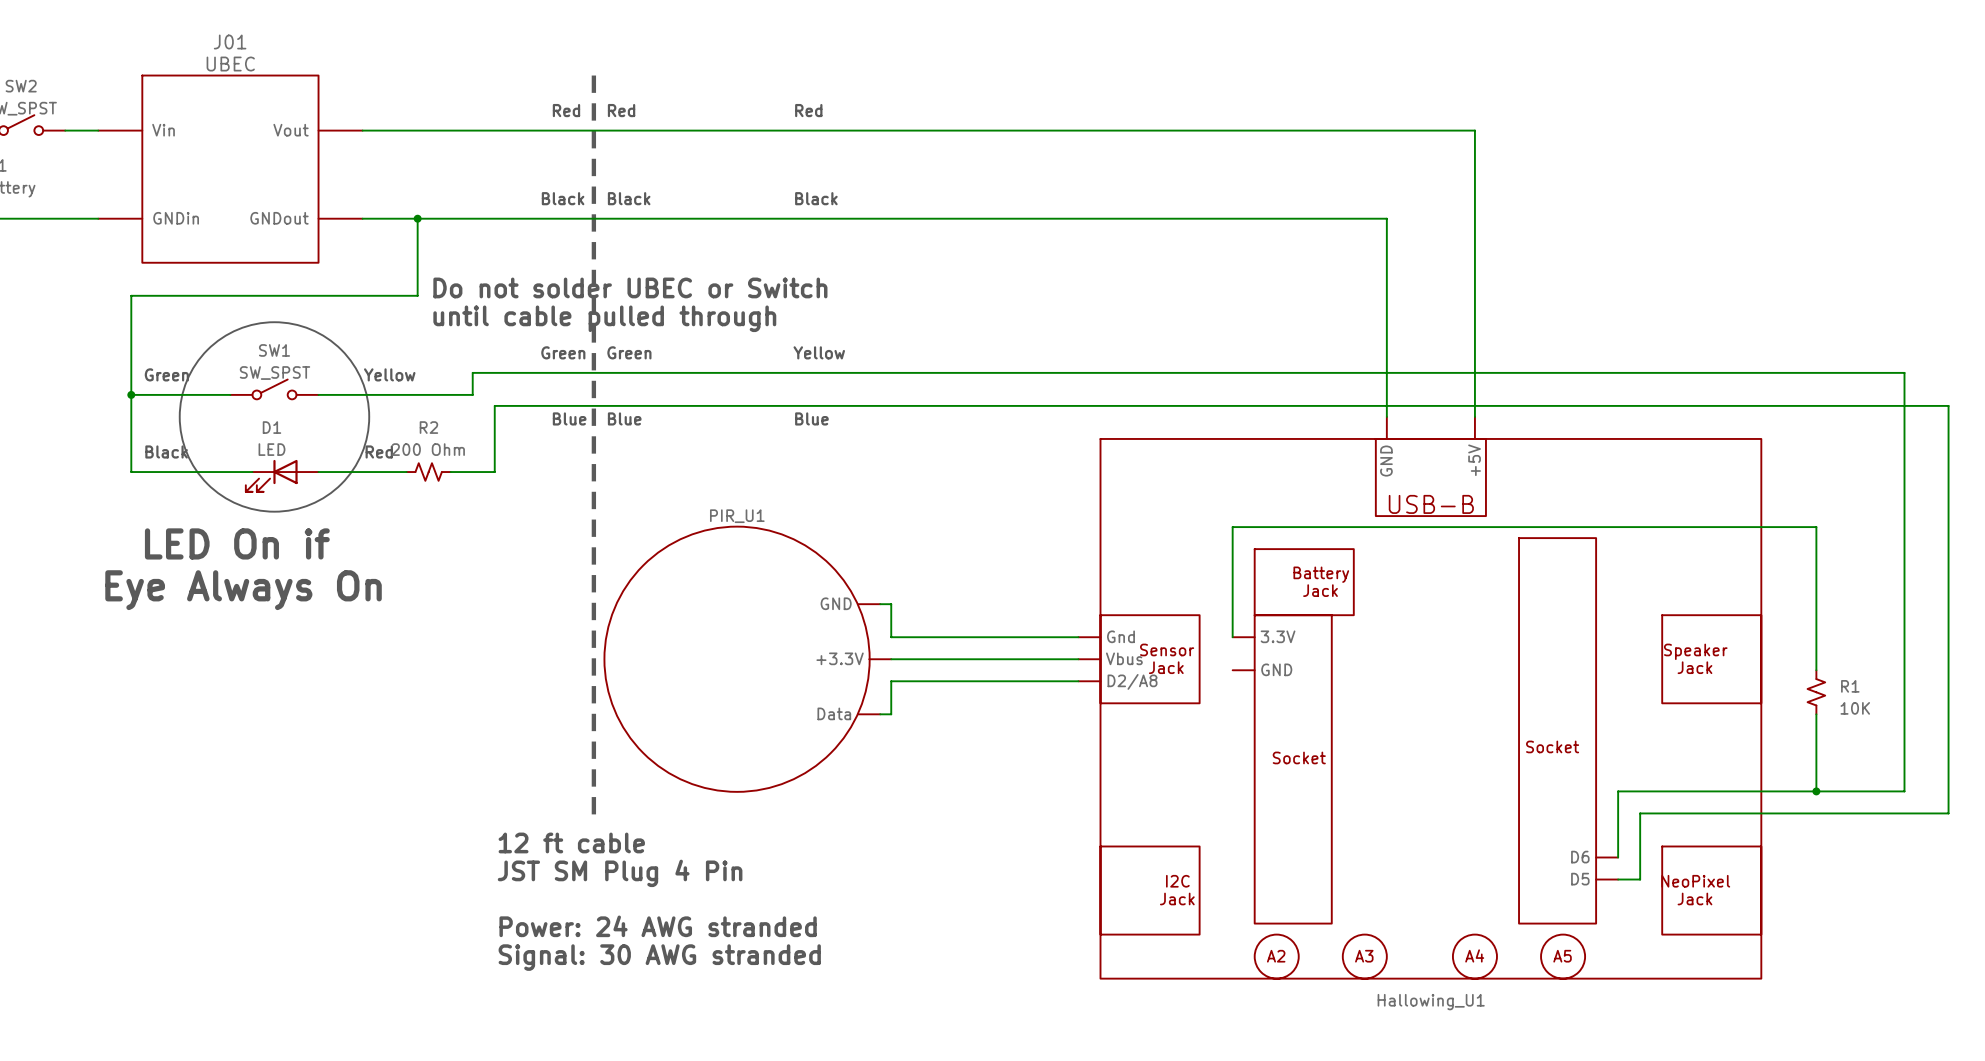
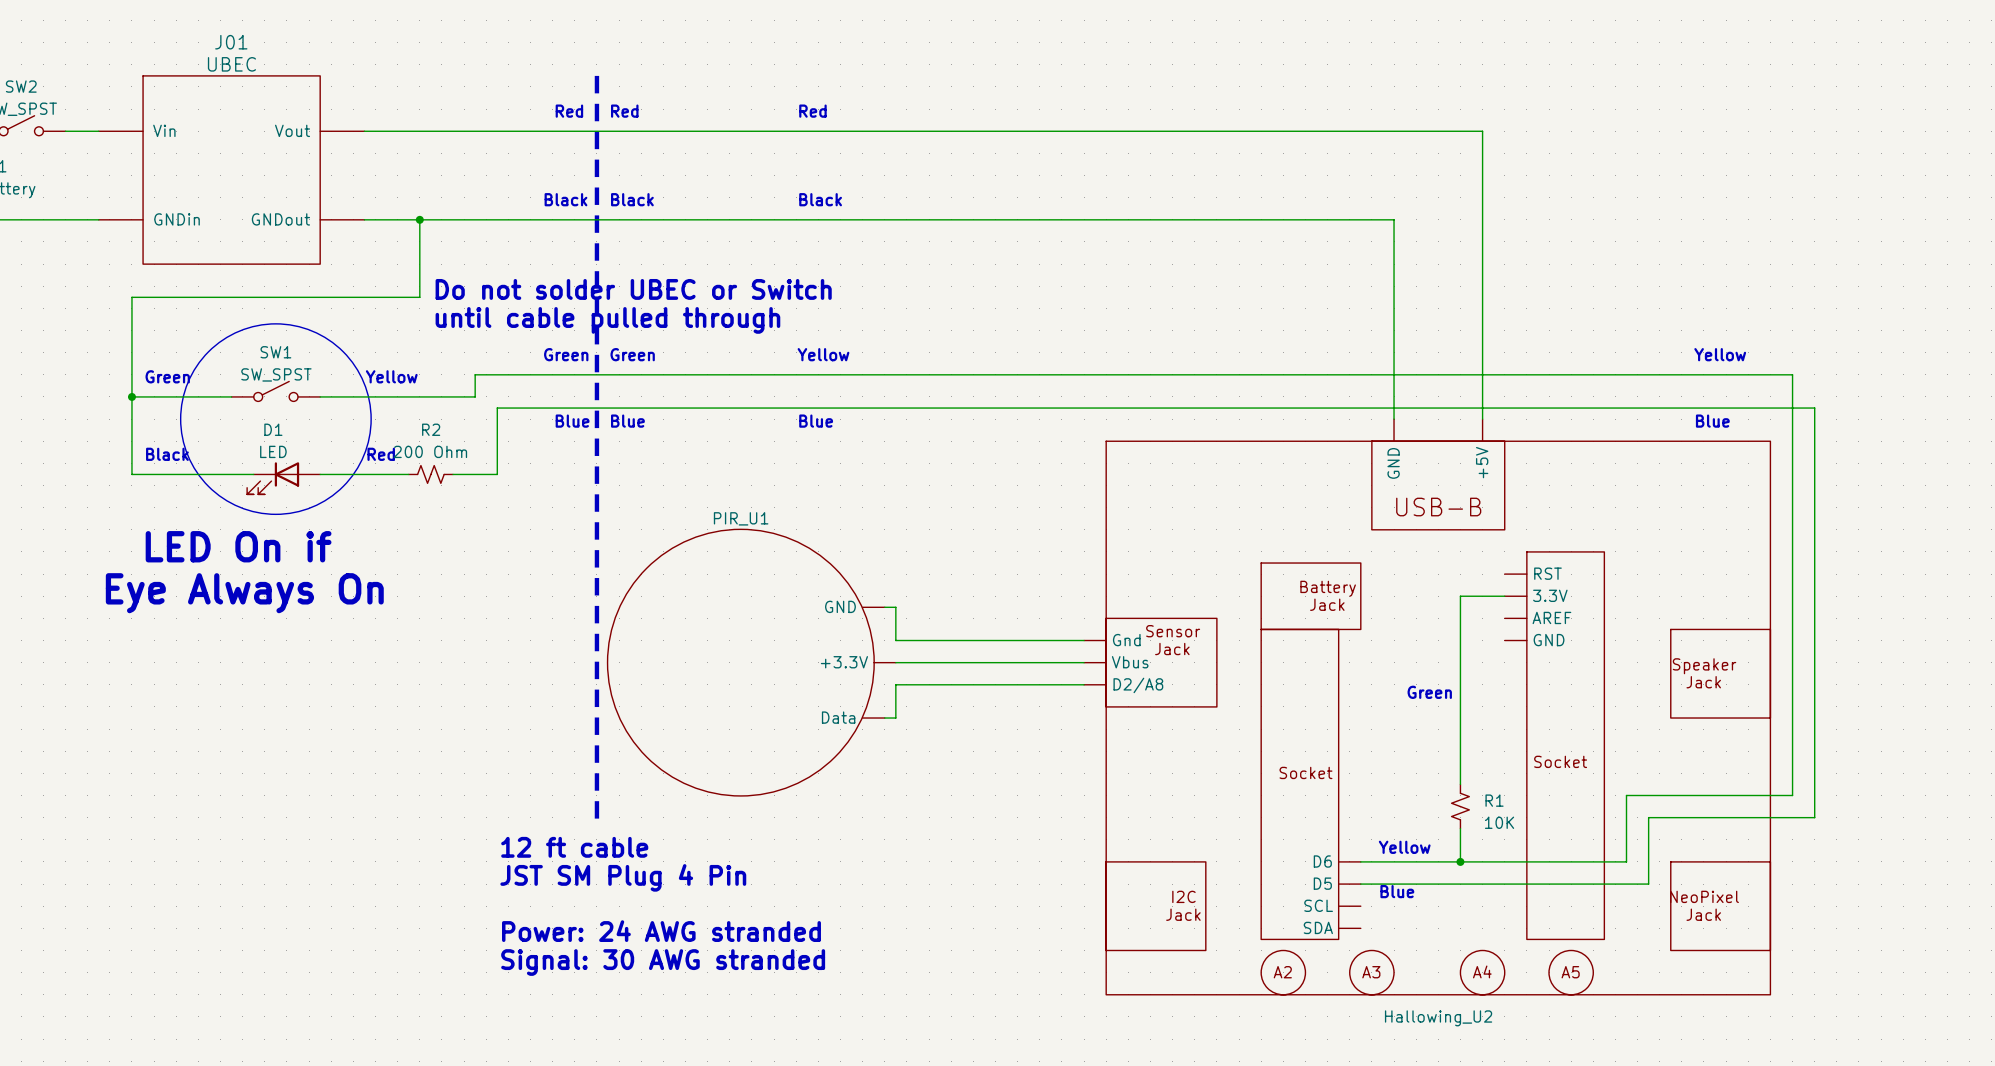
text: none -> Yellow (1720, 354)
wire: (1783, 372) (1904, 372) (1904, 791) (1783, 791) -> (1792, 374) (1792, 795)
wire: (1805, 405) (1948, 405) (1948, 813) (1805, 813) -> (1814, 408) (1814, 817)
text: none -> Blue (1712, 421)
wire: none -> (1504, 596) (1460, 596) (1460, 784)
wire: (1232, 637) (1232, 527) (1816, 527) (1816, 670) -> none
text: none -> Green (1429, 692)
R1 position: (1816, 692) -> (1460, 806)
Hallowing_U1: (1419, 697) -> none
Hallowing_U2: none -> (1427, 706)
wire: (1816, 714) (1816, 791) -> none
junction: (1816, 791) -> none
wire: none -> (1460, 828) (1460, 861)
text: none -> Yellow (1404, 847)
wire: none -> (1360, 861) (1626, 861)
junction: none -> (1460, 861)
wire: none -> (1360, 884) (1626, 884)
text: none -> Blue (1397, 891)

